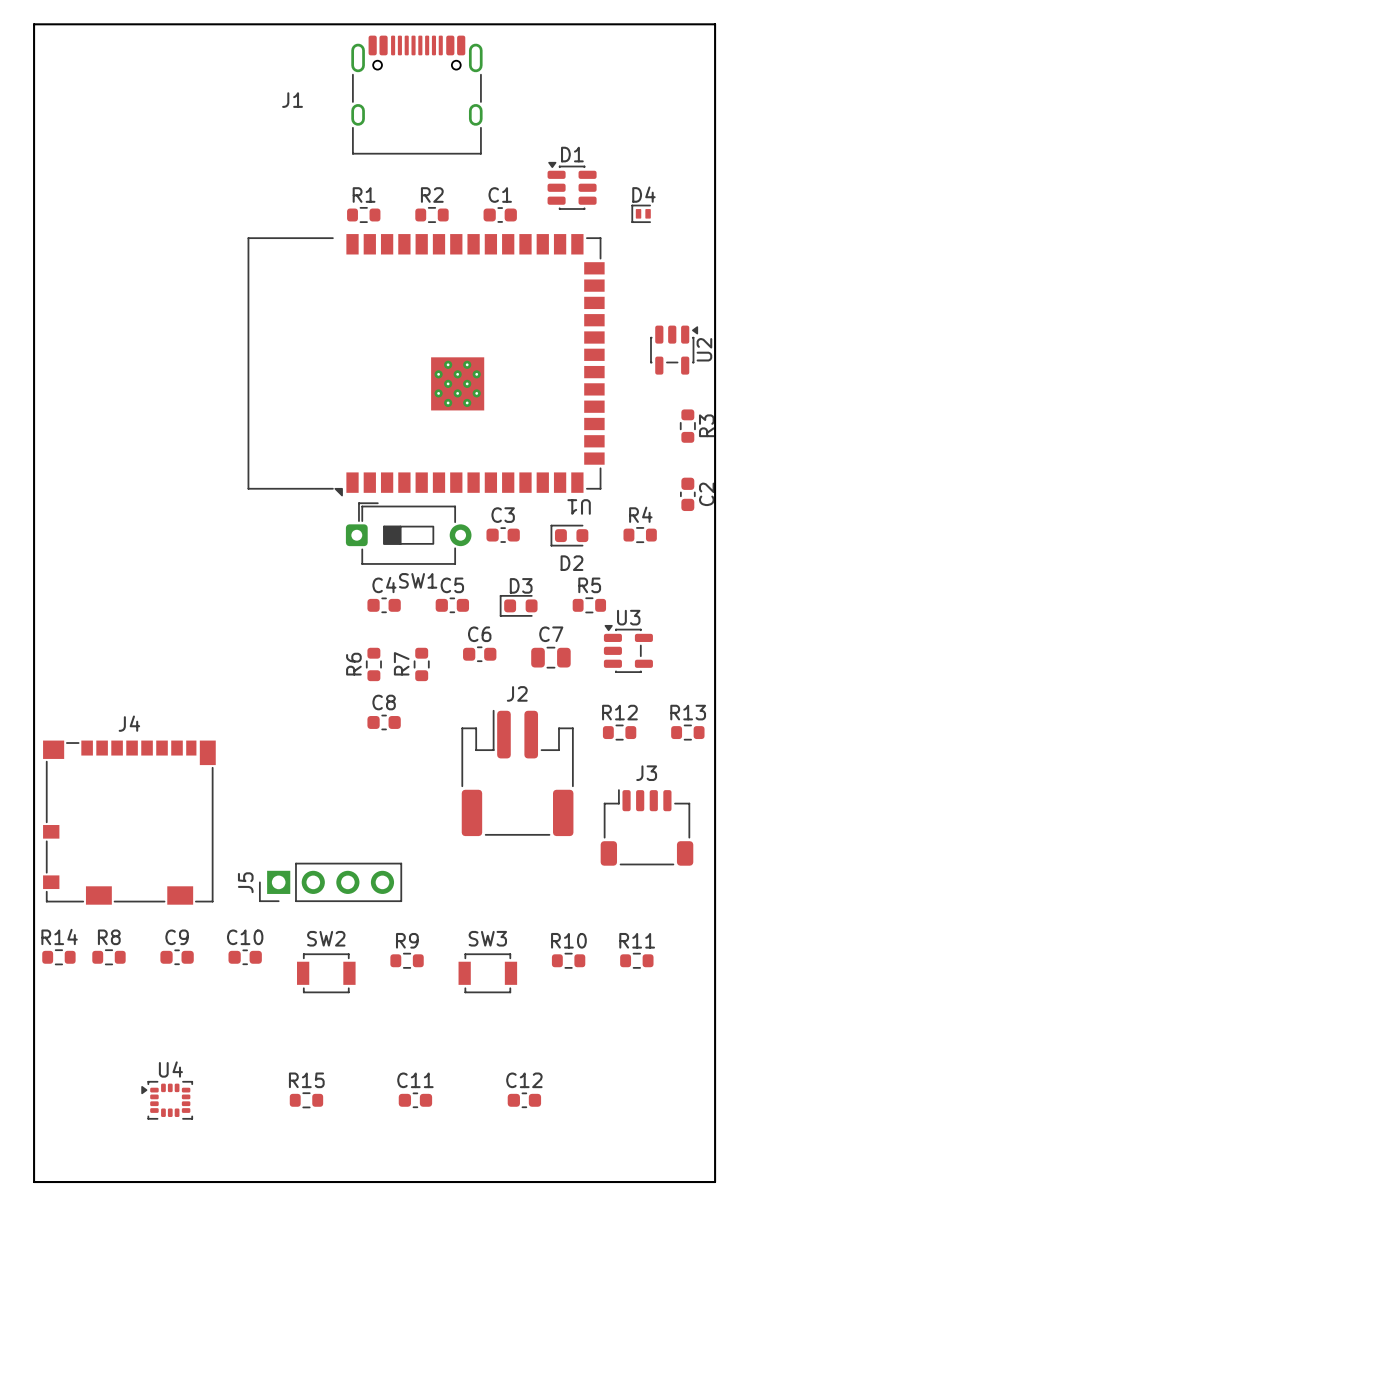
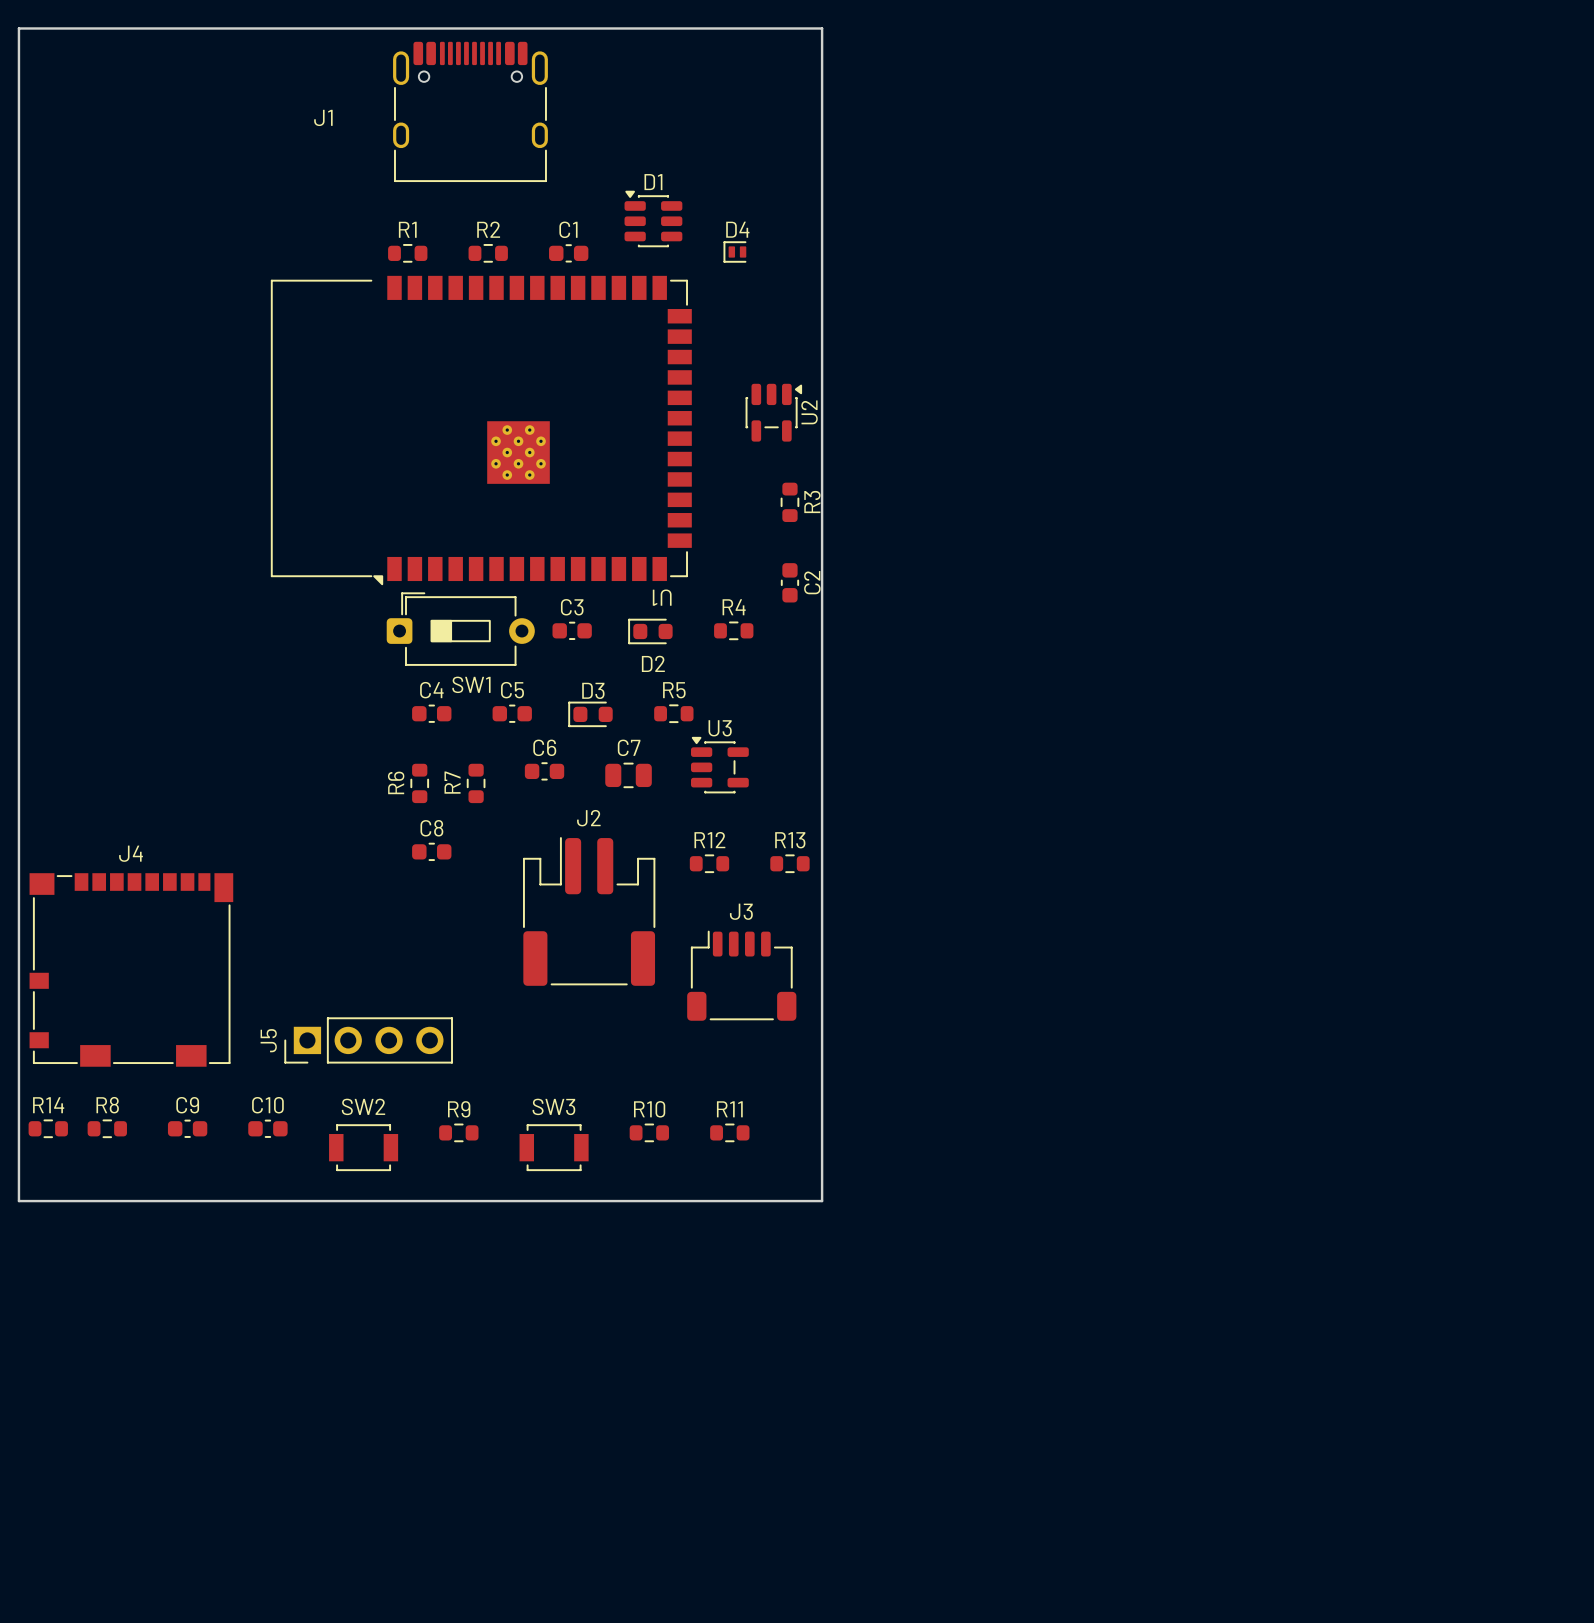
board edge: (34, 1018) (34, 1182) (715, 1182) (715, 1018) -> (18, 1201) (822, 1201)
U4: (167, 1100) -> none
R15: (306, 1100) -> none
C11: (415, 1100) -> none
C12: (524, 1100) -> none

